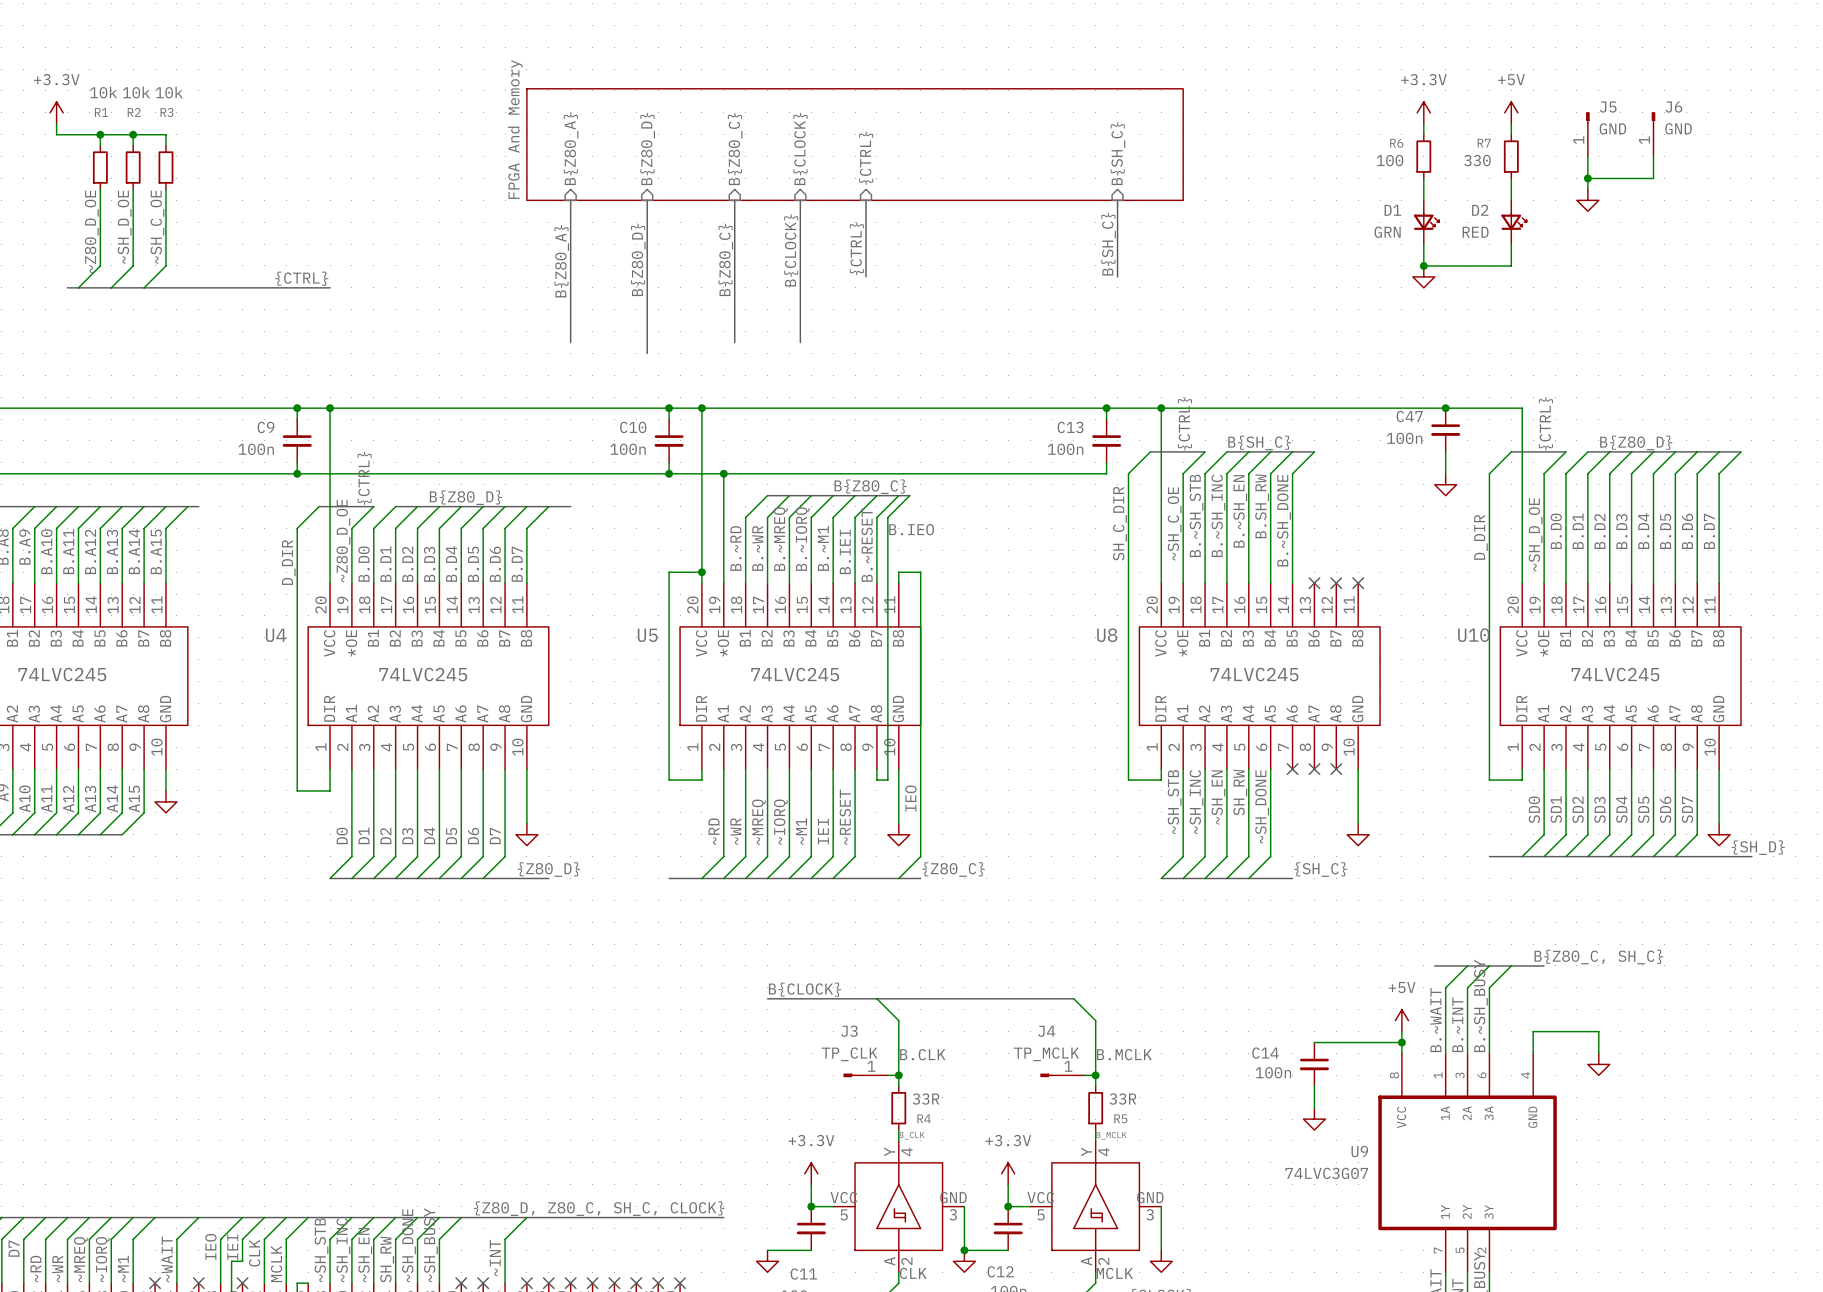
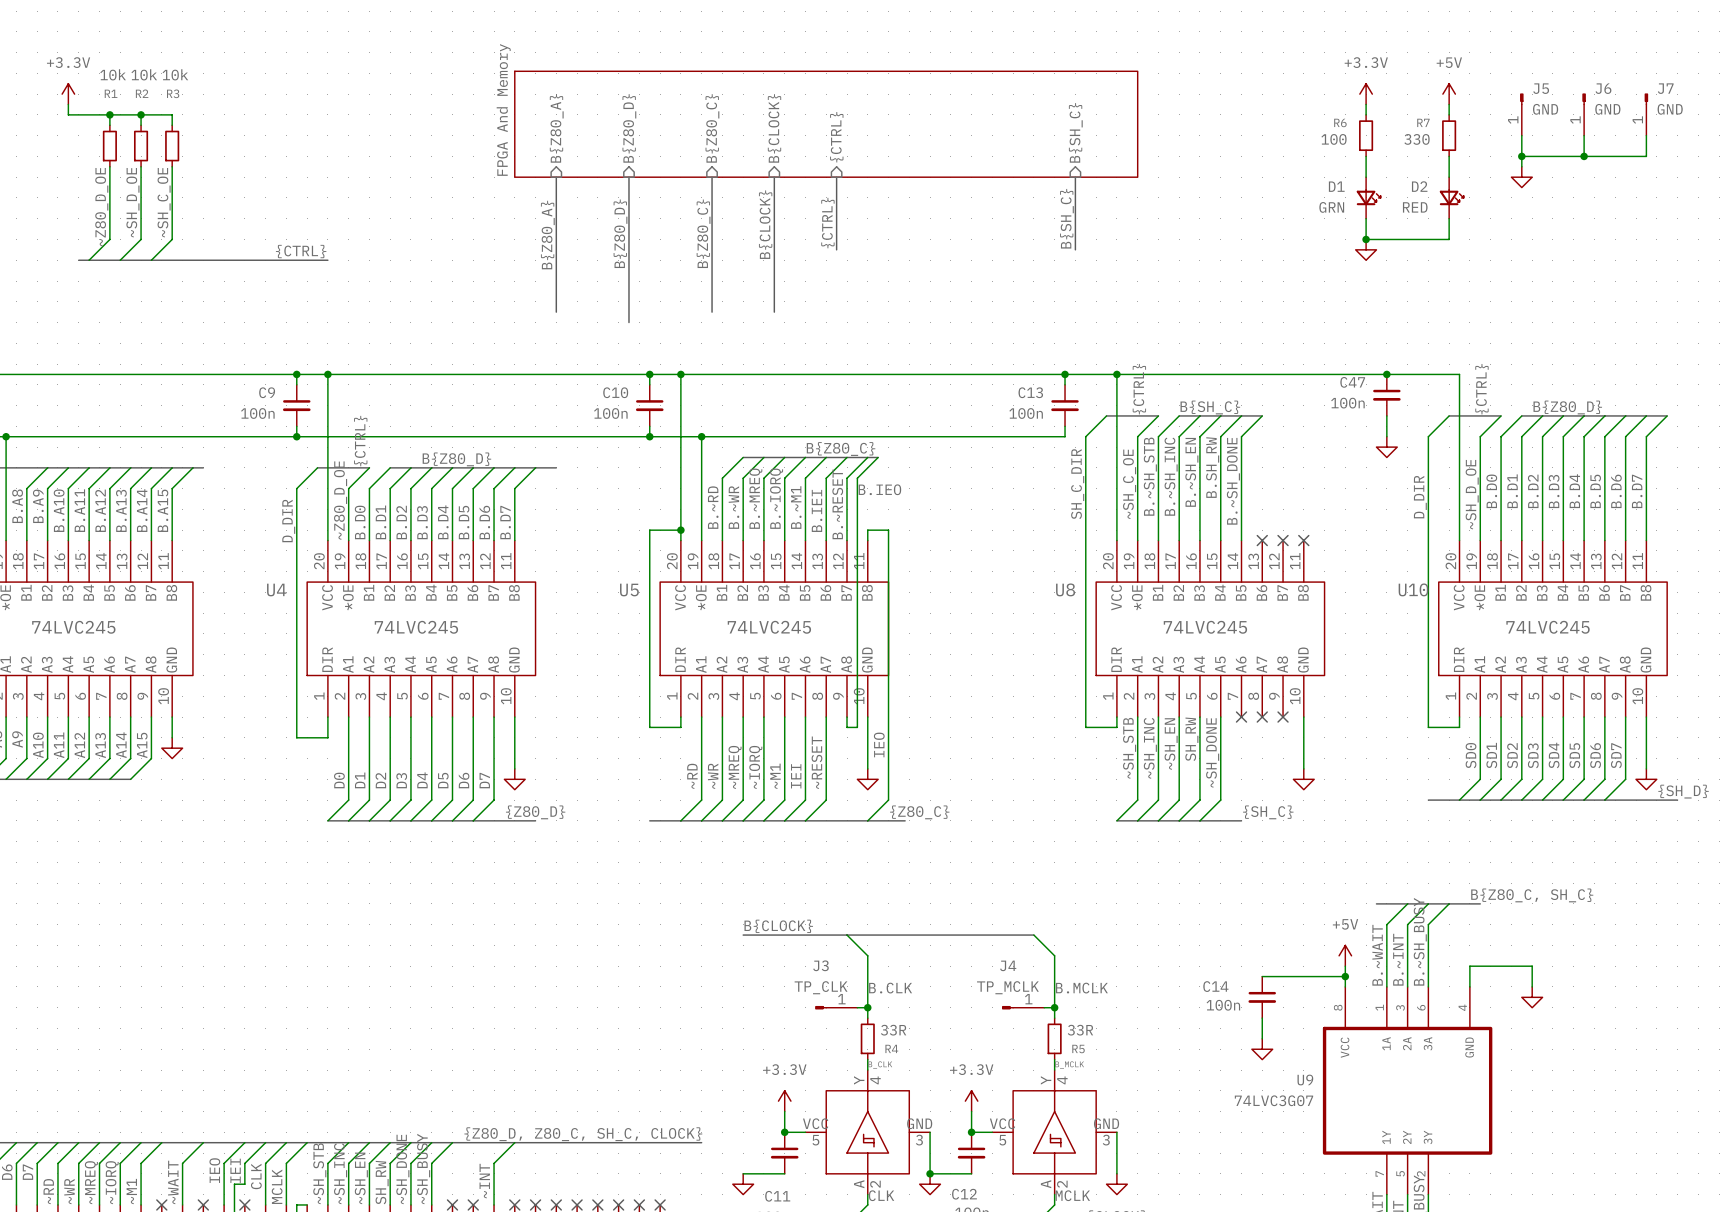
J7: none -> GND (1646, 114)
wire: none -> (1646, 135) (1646, 156) (1584, 156)
junction: none -> (1584, 156)
bus: none -> (888, 820) (905, 820)

